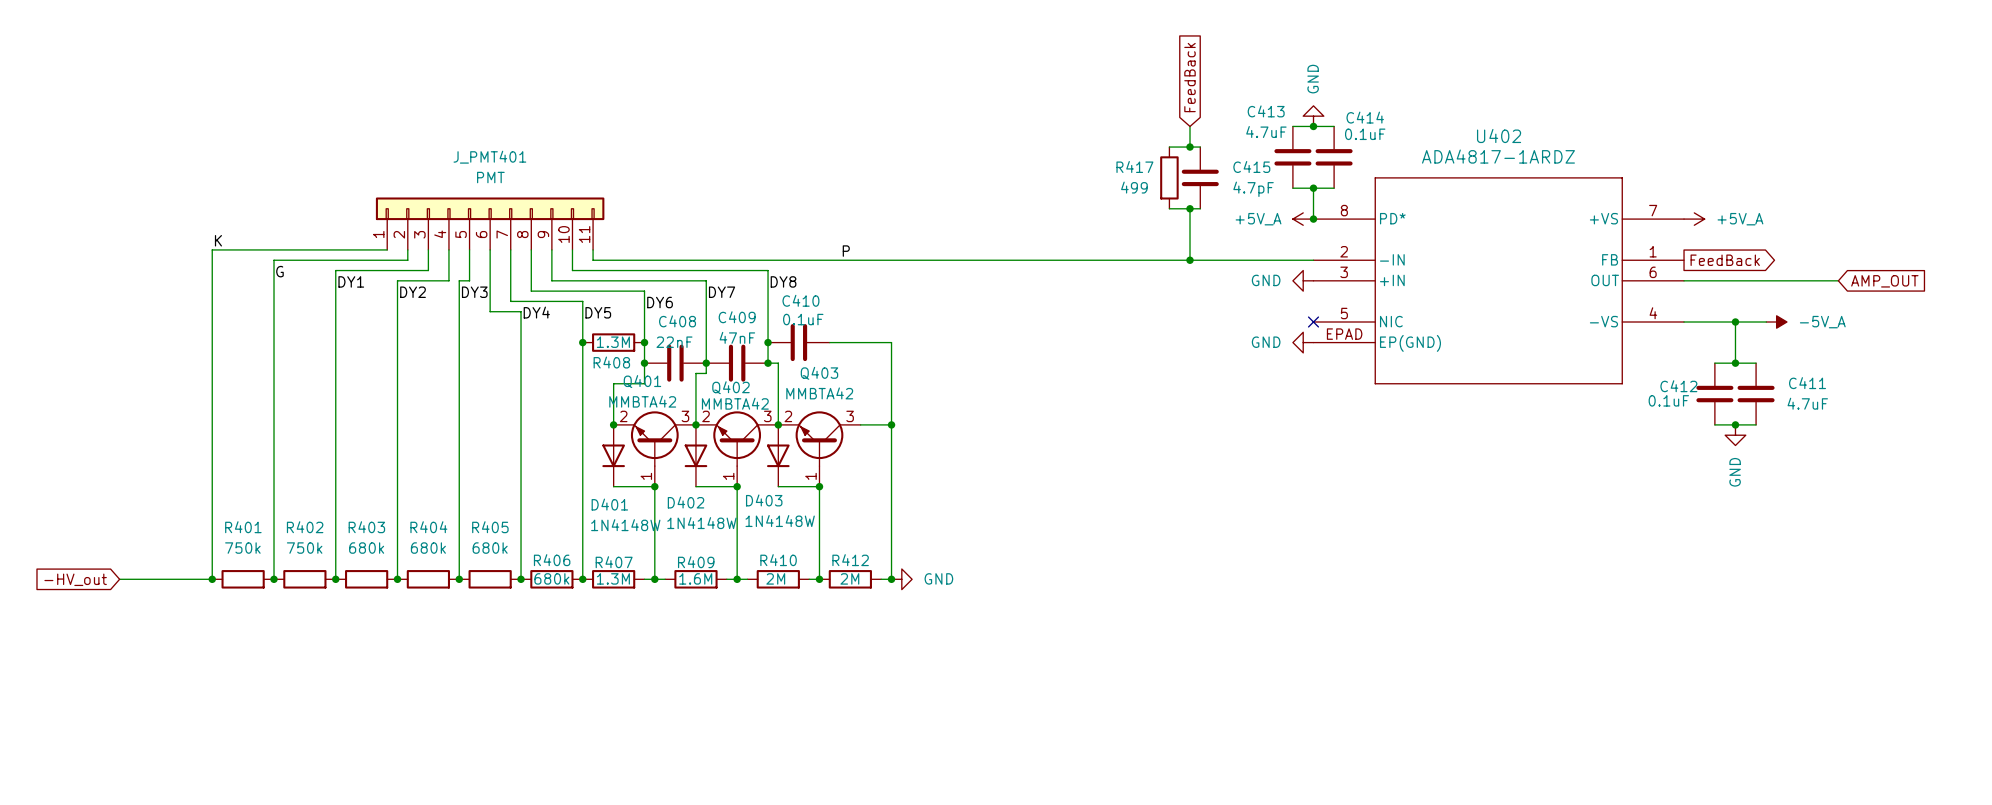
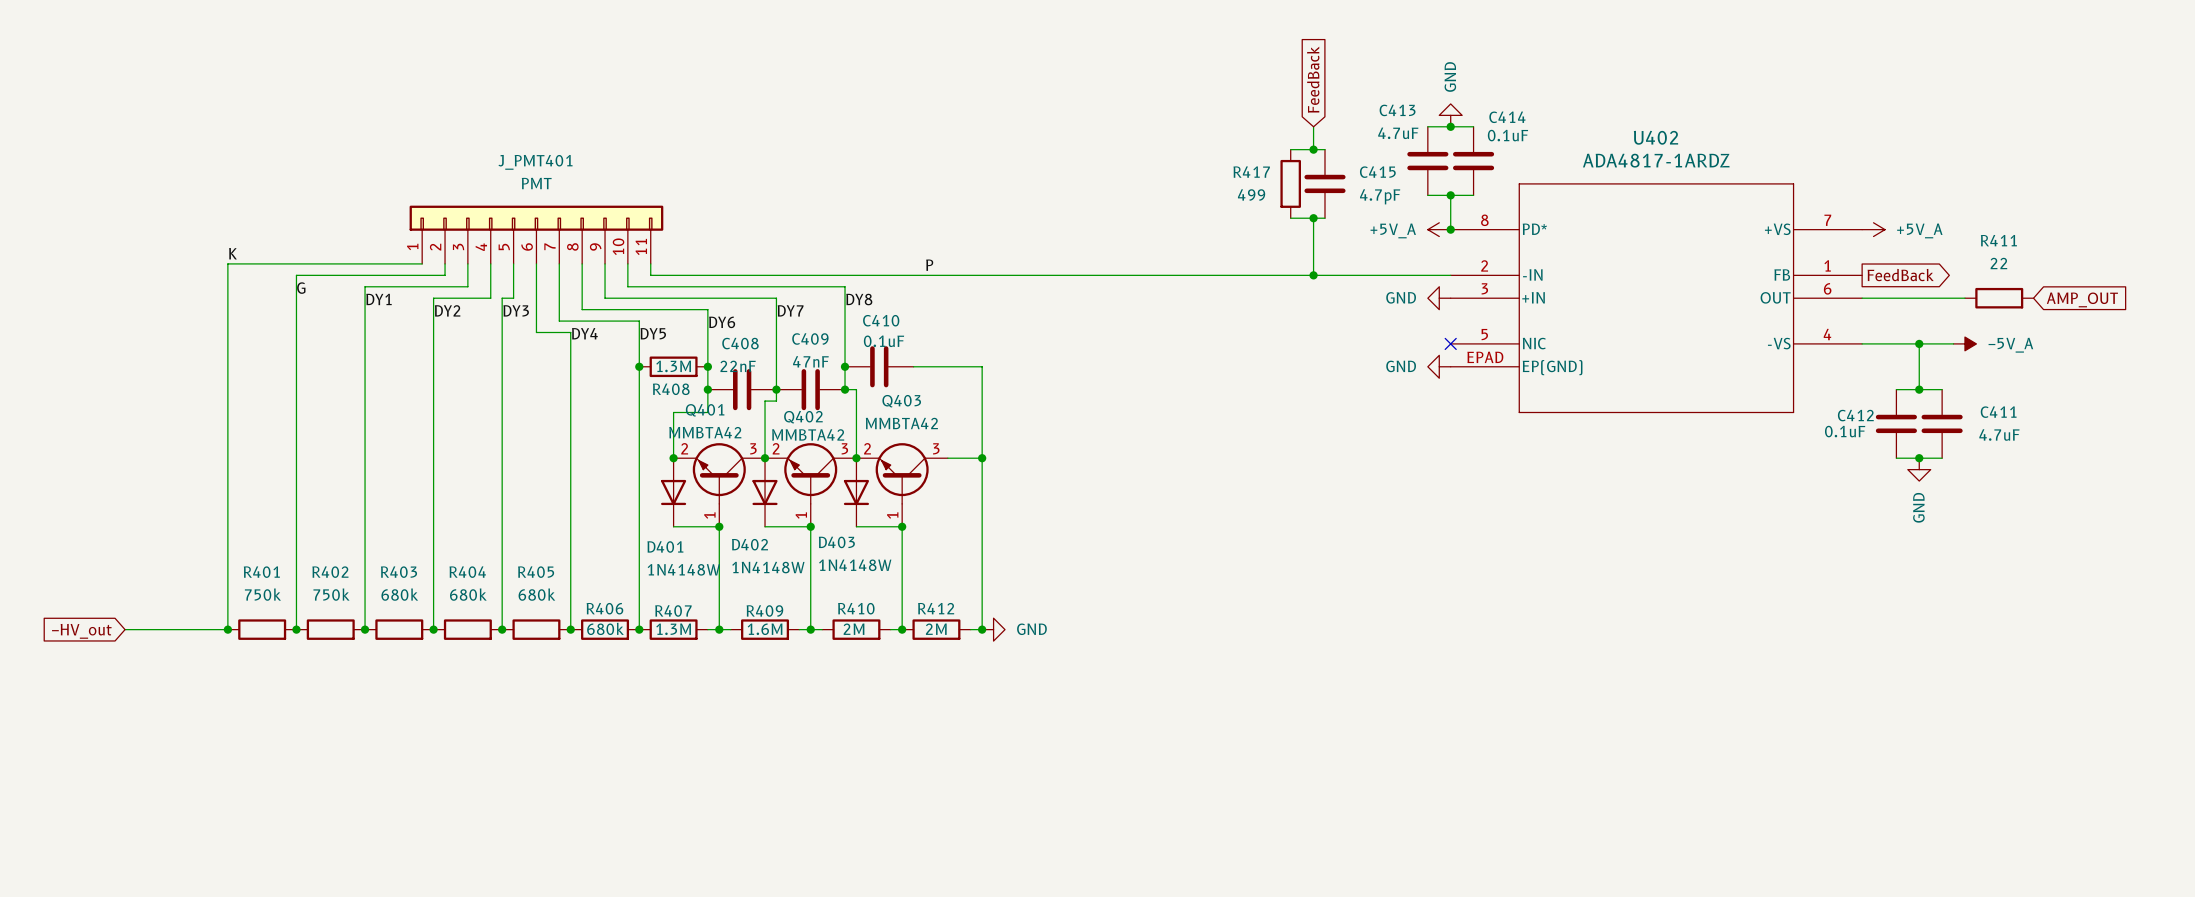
wire: (1776, 280) (1838, 280) -> none
R411: none -> 22 (1999, 298)

